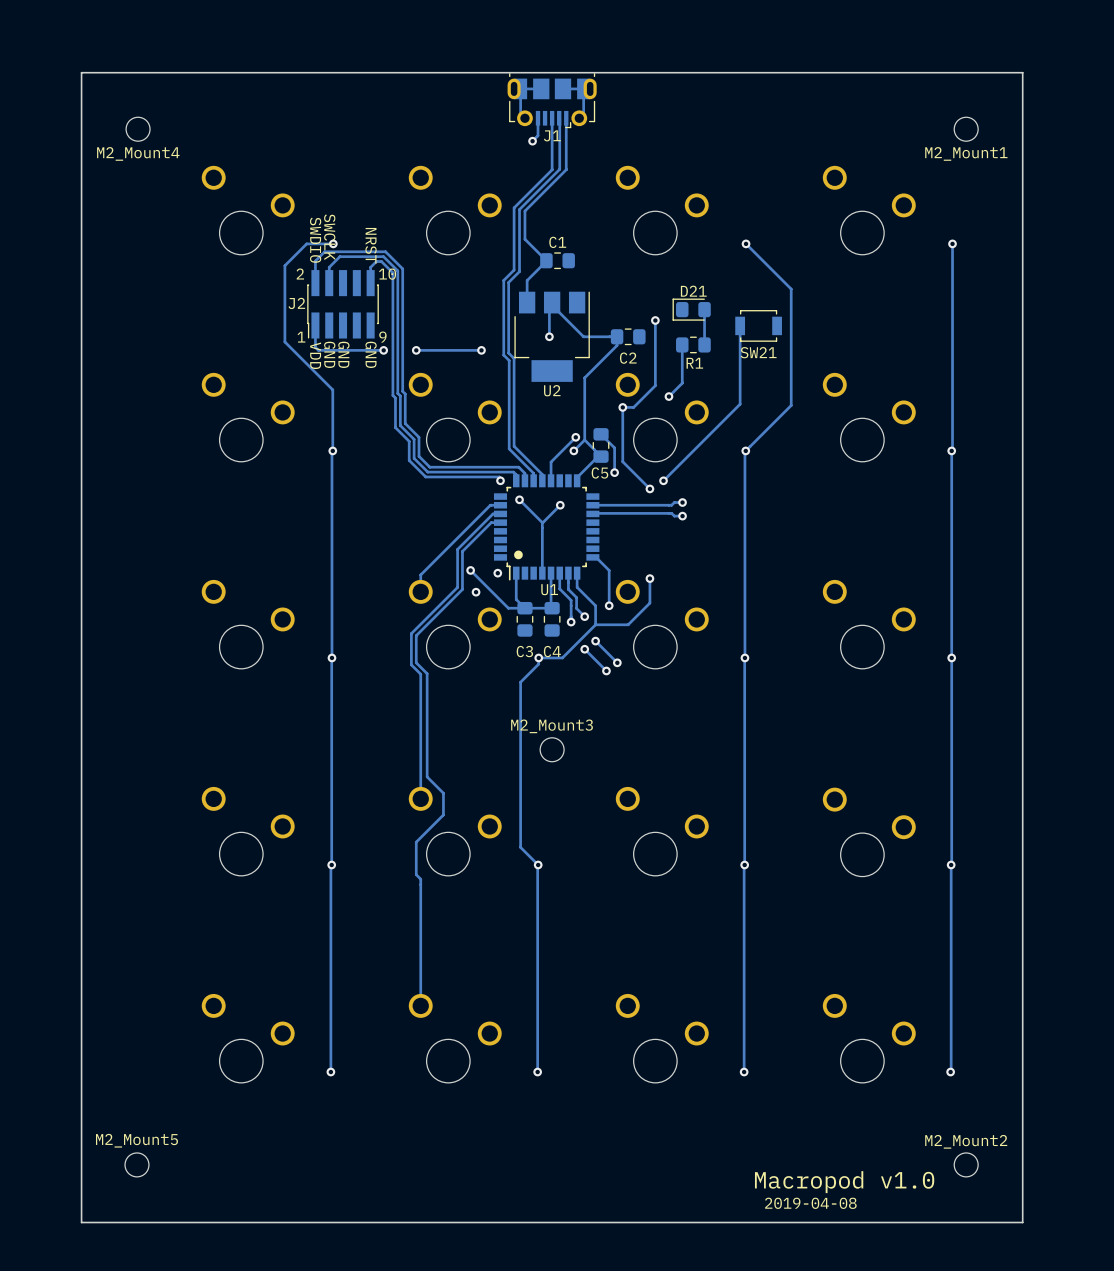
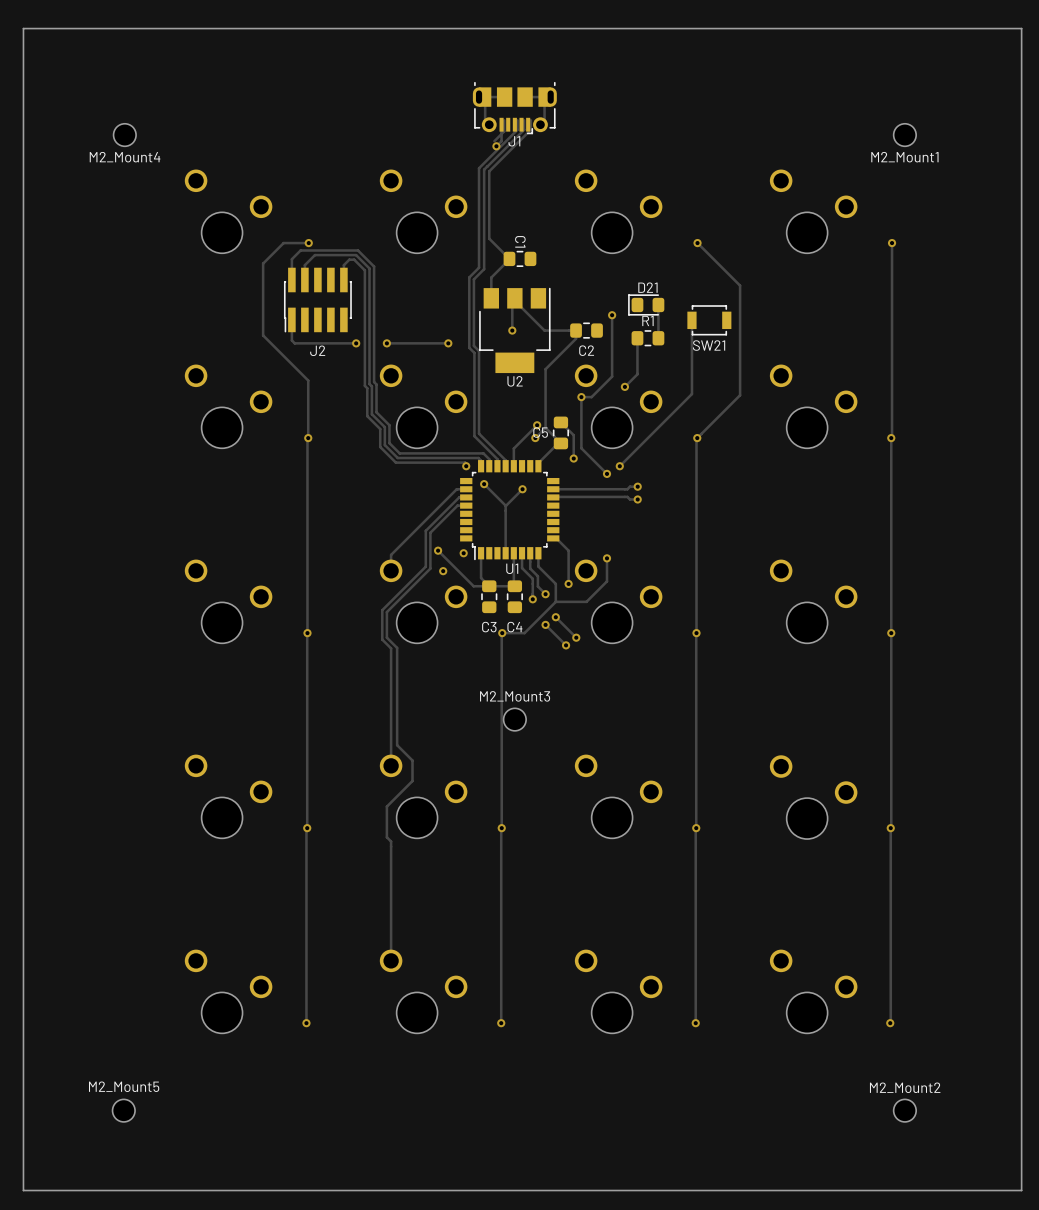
board edge: (1022, 72) (1022, 1222) (81, 1222) (81, 72) (1022, 72) -> (1021, 28) (1021, 1190) (23, 1190) (23, 28) (1021, 28)
track: none -> (504, 120) (504, 131) (494, 141)
track: none -> (524, 120) (524, 129) (487, 166)
track: (559, 118) (559, 169) (519, 209) -> (487, 166) (484, 169) (484, 210)
track: (566, 118) (566, 169) -> none
track: (552, 119) (552, 169) -> none
track: (552, 169) (514, 207) -> (517, 120) (517, 129) (479, 168) (479, 209)
track: (566, 169) (524, 211) -> (530, 120) (530, 129) (489, 171) (489, 212)
text: SWCLK (329, 237) -> none
text: SWDIO (315, 240) -> none
C1 name rotation: 0° (557, 242) -> 90° clockwise (520, 241)
text: NRST (371, 245) -> none
text: 2 (300, 274) -> none
text: 10 (387, 274) -> none
J2 name position: J2 (296, 303) -> J2 (317, 350)
text: 1 (301, 337) -> none
text: 9 (382, 337) -> none
text: GND (329, 354) -> none
text: GND (343, 354) -> none
text: GND (371, 354) -> none
text: VDD (315, 355) -> none
R1 name position: R1 (694, 363) -> R1 (647, 320)
C5 name position: C5 (599, 472) -> C5 (540, 432)
drawing: [514, 550, 523, 560] -> none
track: (538, 657) (538, 664) (520, 682) (520, 847) (538, 864) -> (501, 633) (501, 828)
text: Macropod v1.0 (844, 1182) -> none
text: 2019-04-08 (810, 1203) -> none

